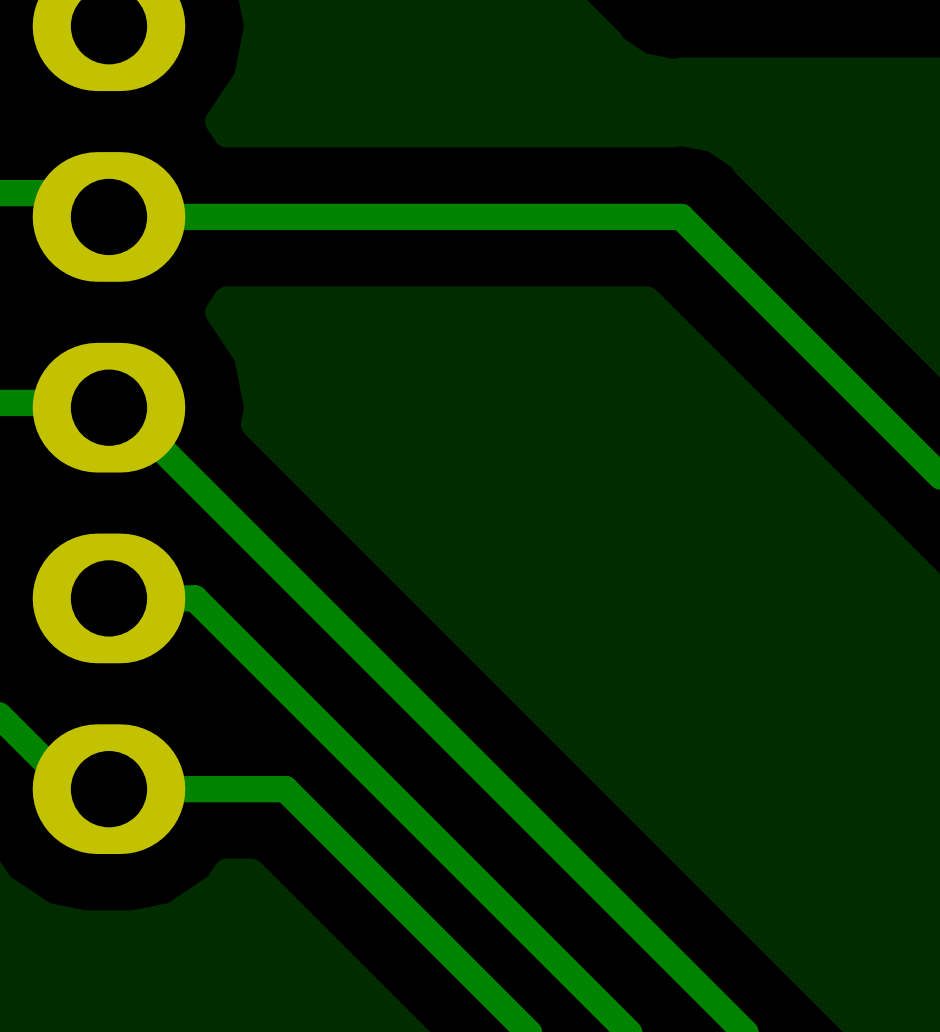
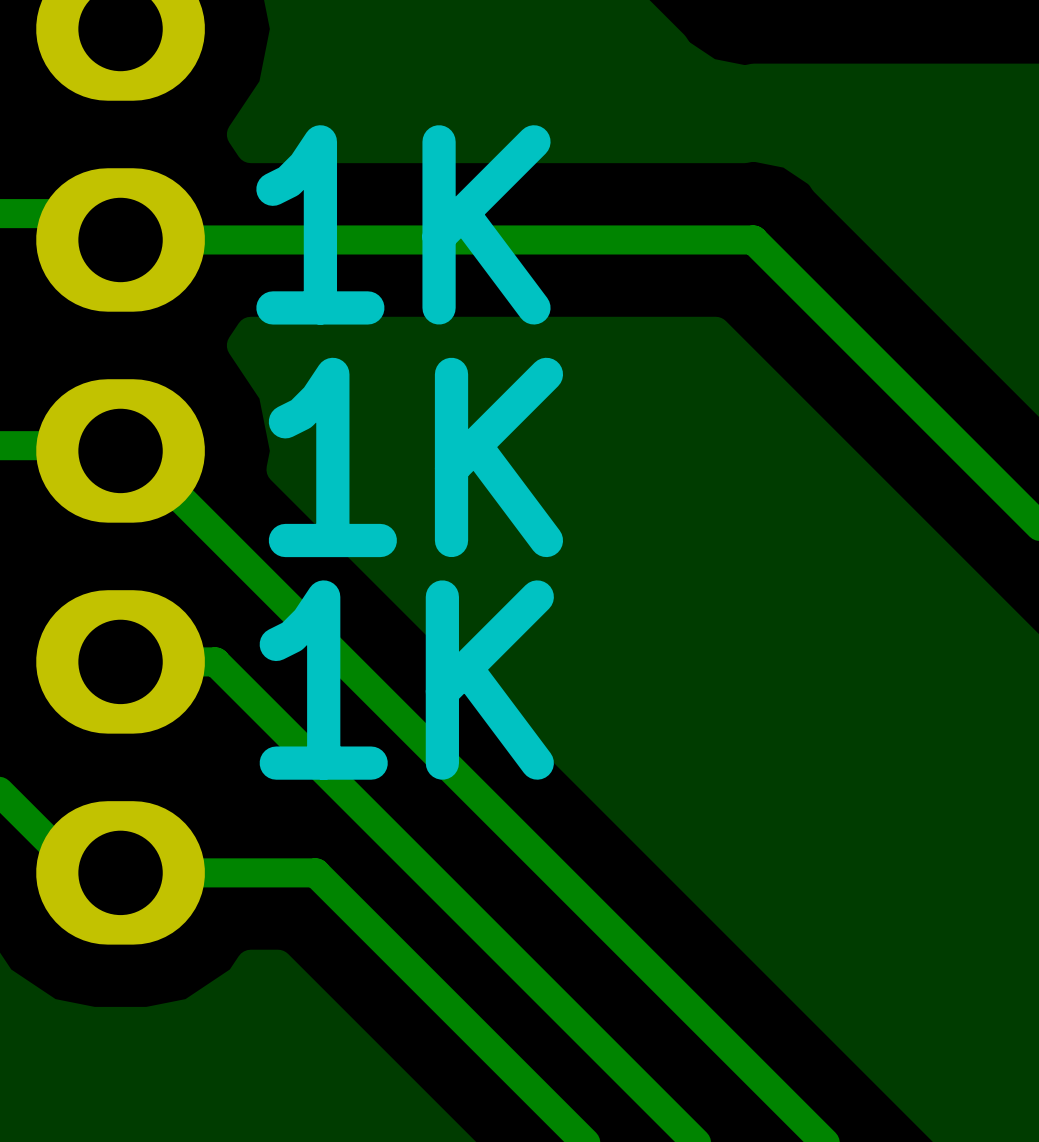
text: none -> 1K (403, 224)
text: none -> 1K (415, 457)
text: none -> 1K (406, 680)

